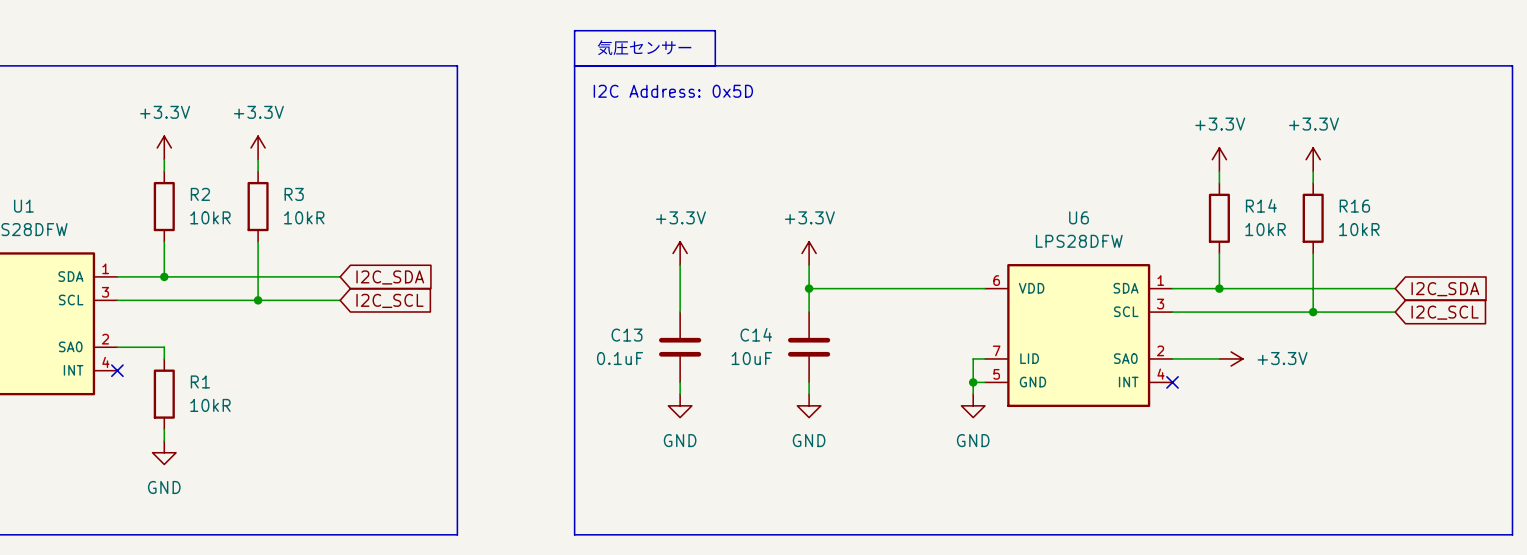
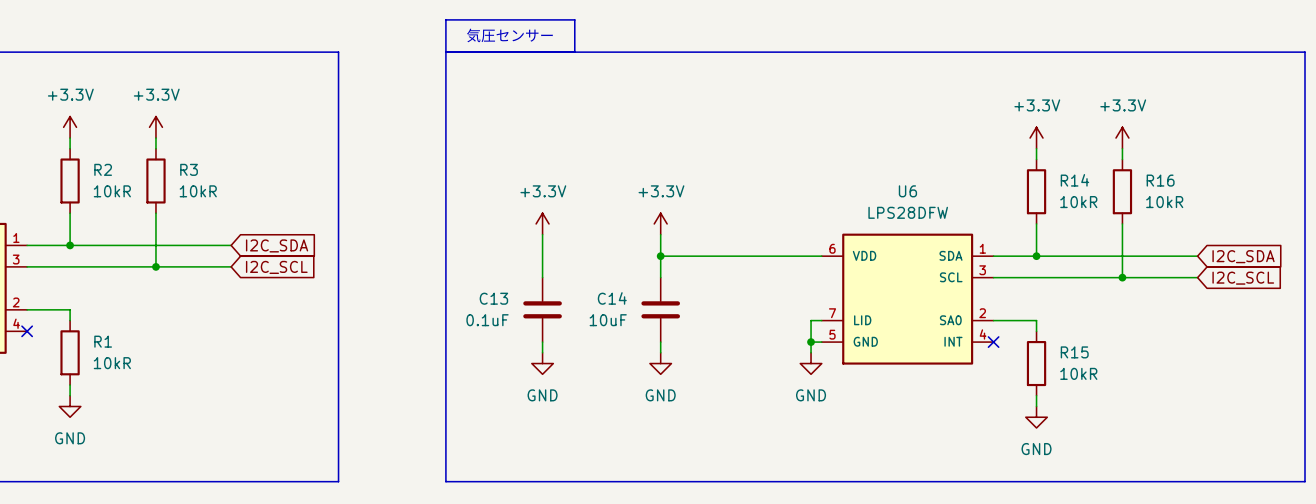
text: I2C Address: 0x5D (673, 91) -> none
wire: none -> (1036, 320) (1036, 331)
power symbol: +3.3V (1231, 358) -> none
R15: none -> 10kR (1036, 363)
wire: none -> (1036, 395) (1036, 406)
power symbol: none -> GND (1036, 417)

